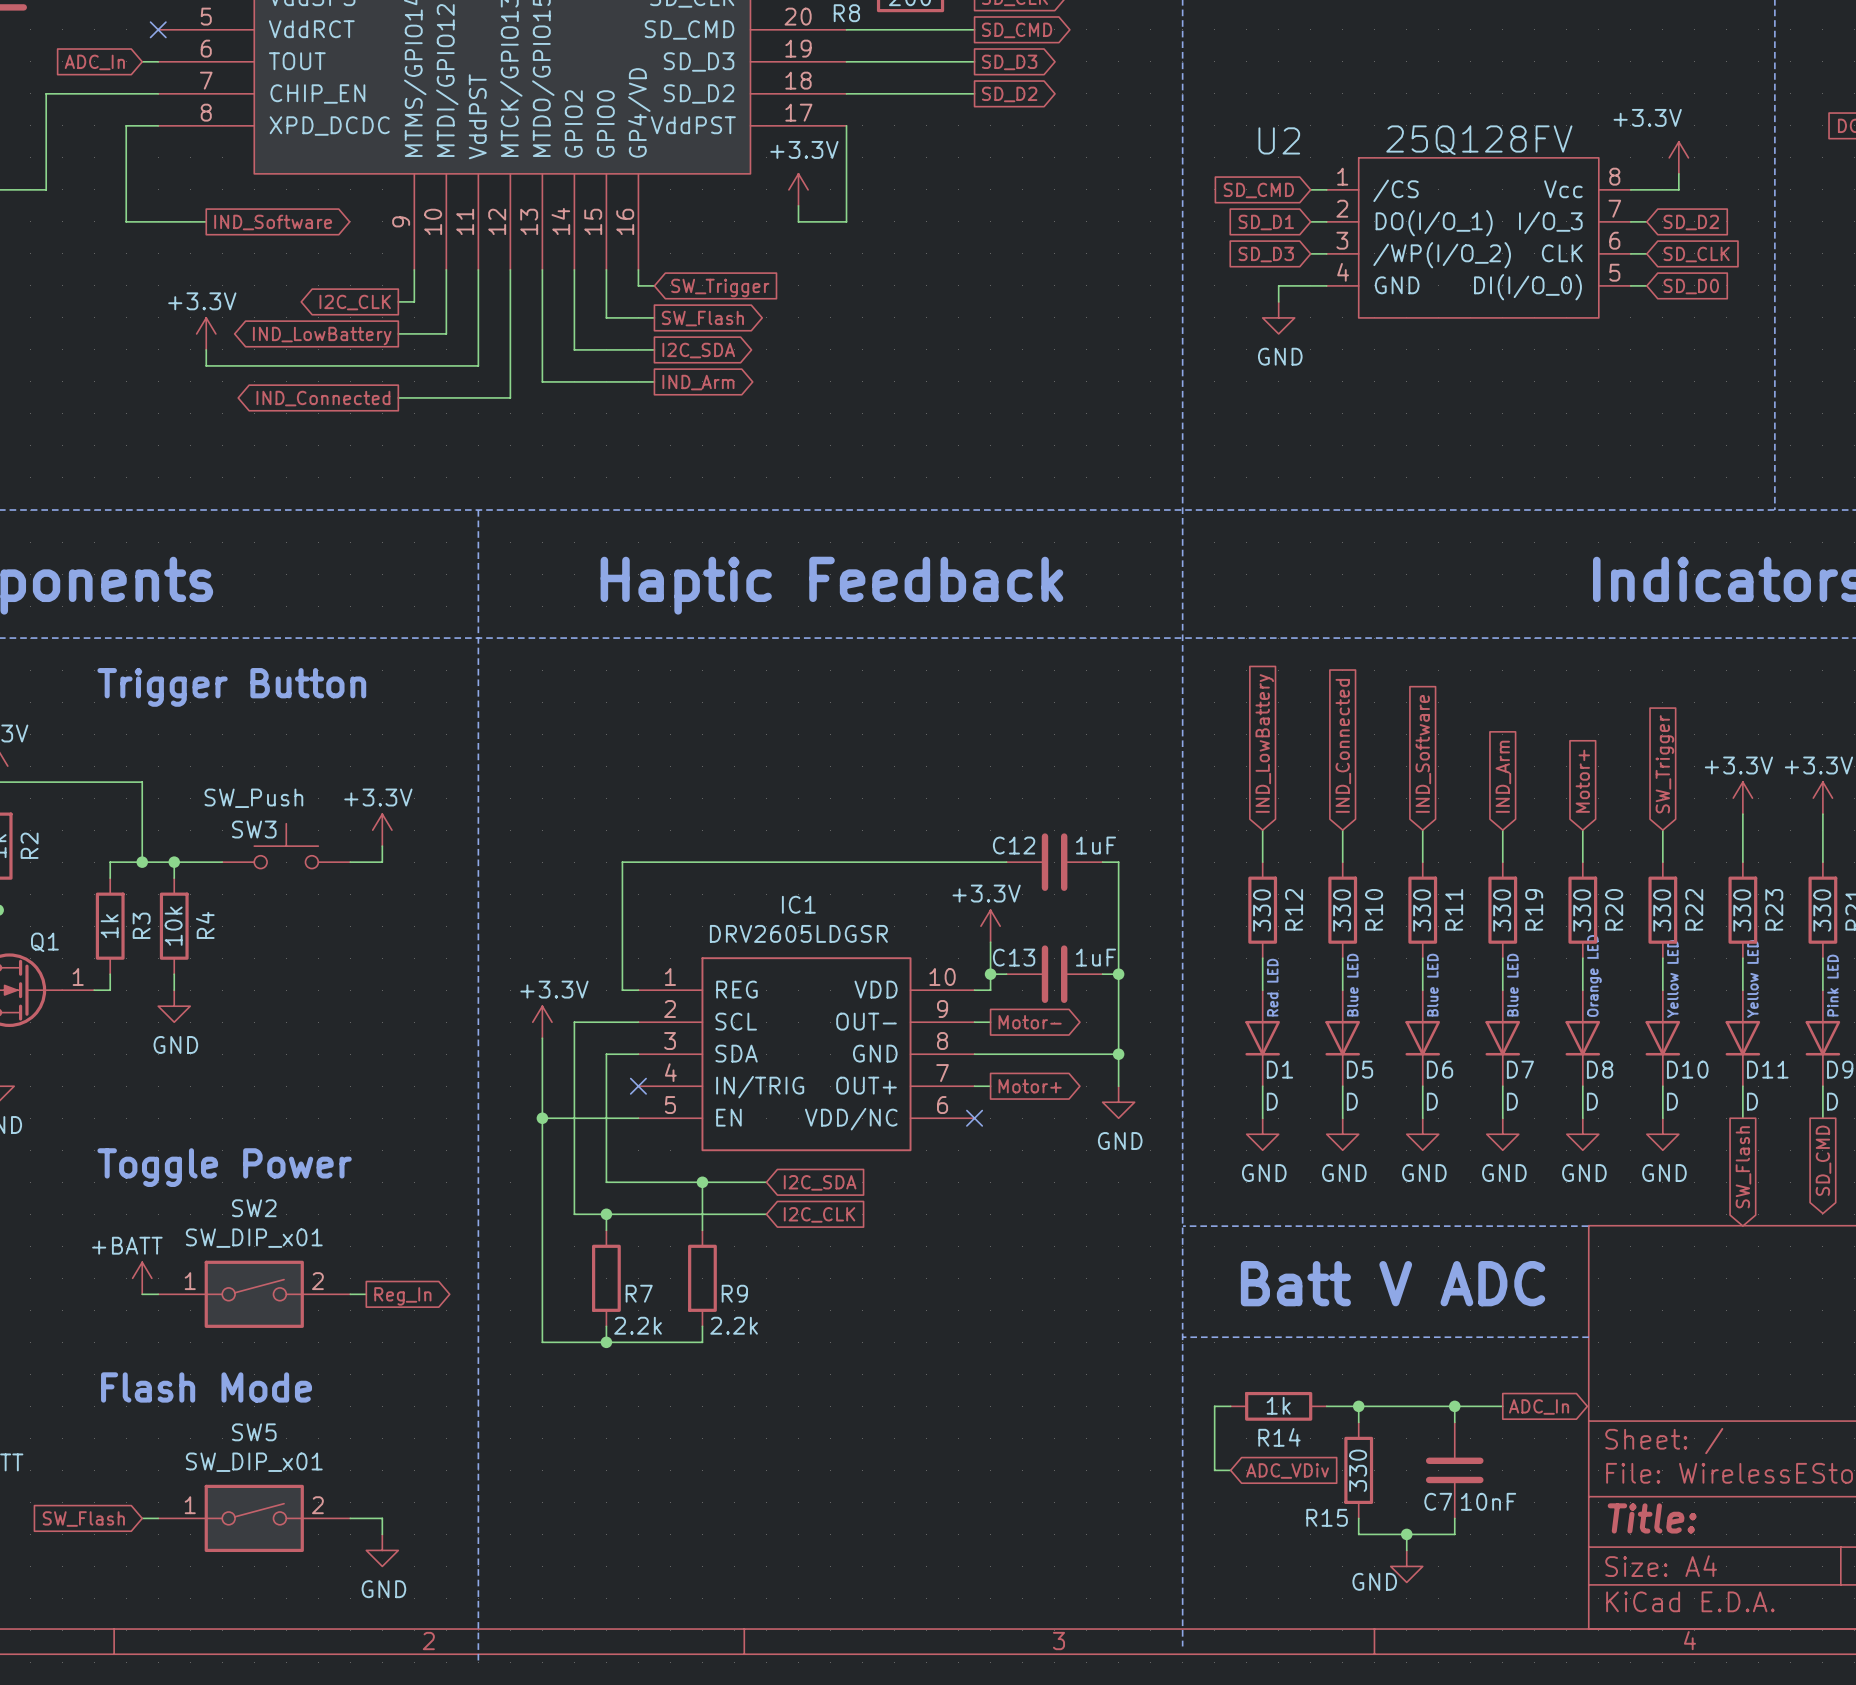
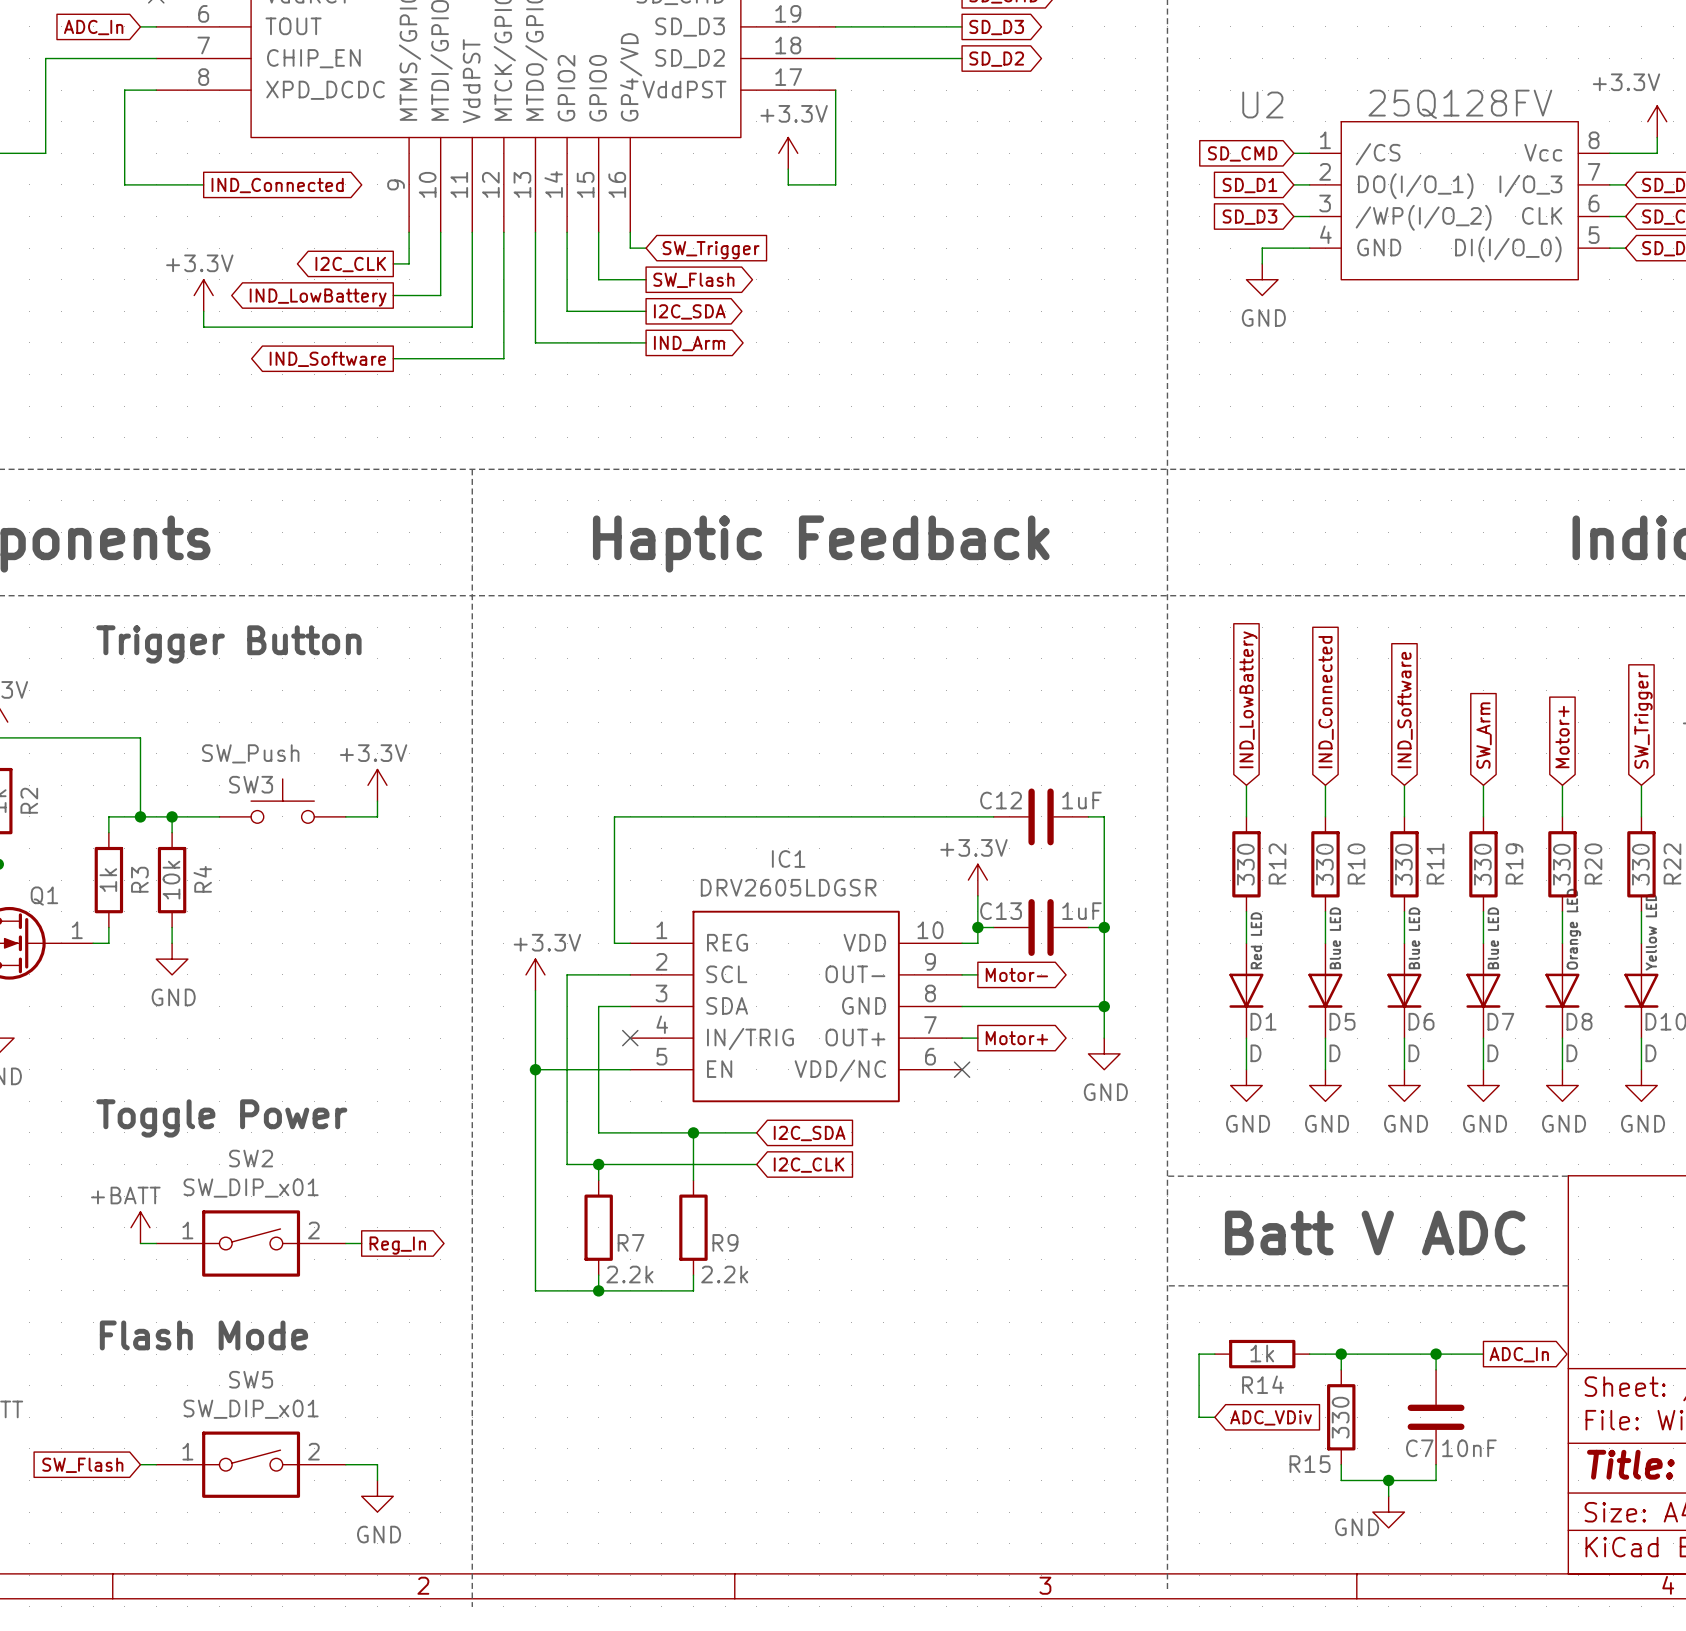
global label: IND_Software (273, 222) -> IND_Connected (277, 185)
global label: IND_Connected (323, 398) -> IND_Software (327, 359)
global label: IND_Arm (1503, 776) -> SW_Arm (1484, 735)

